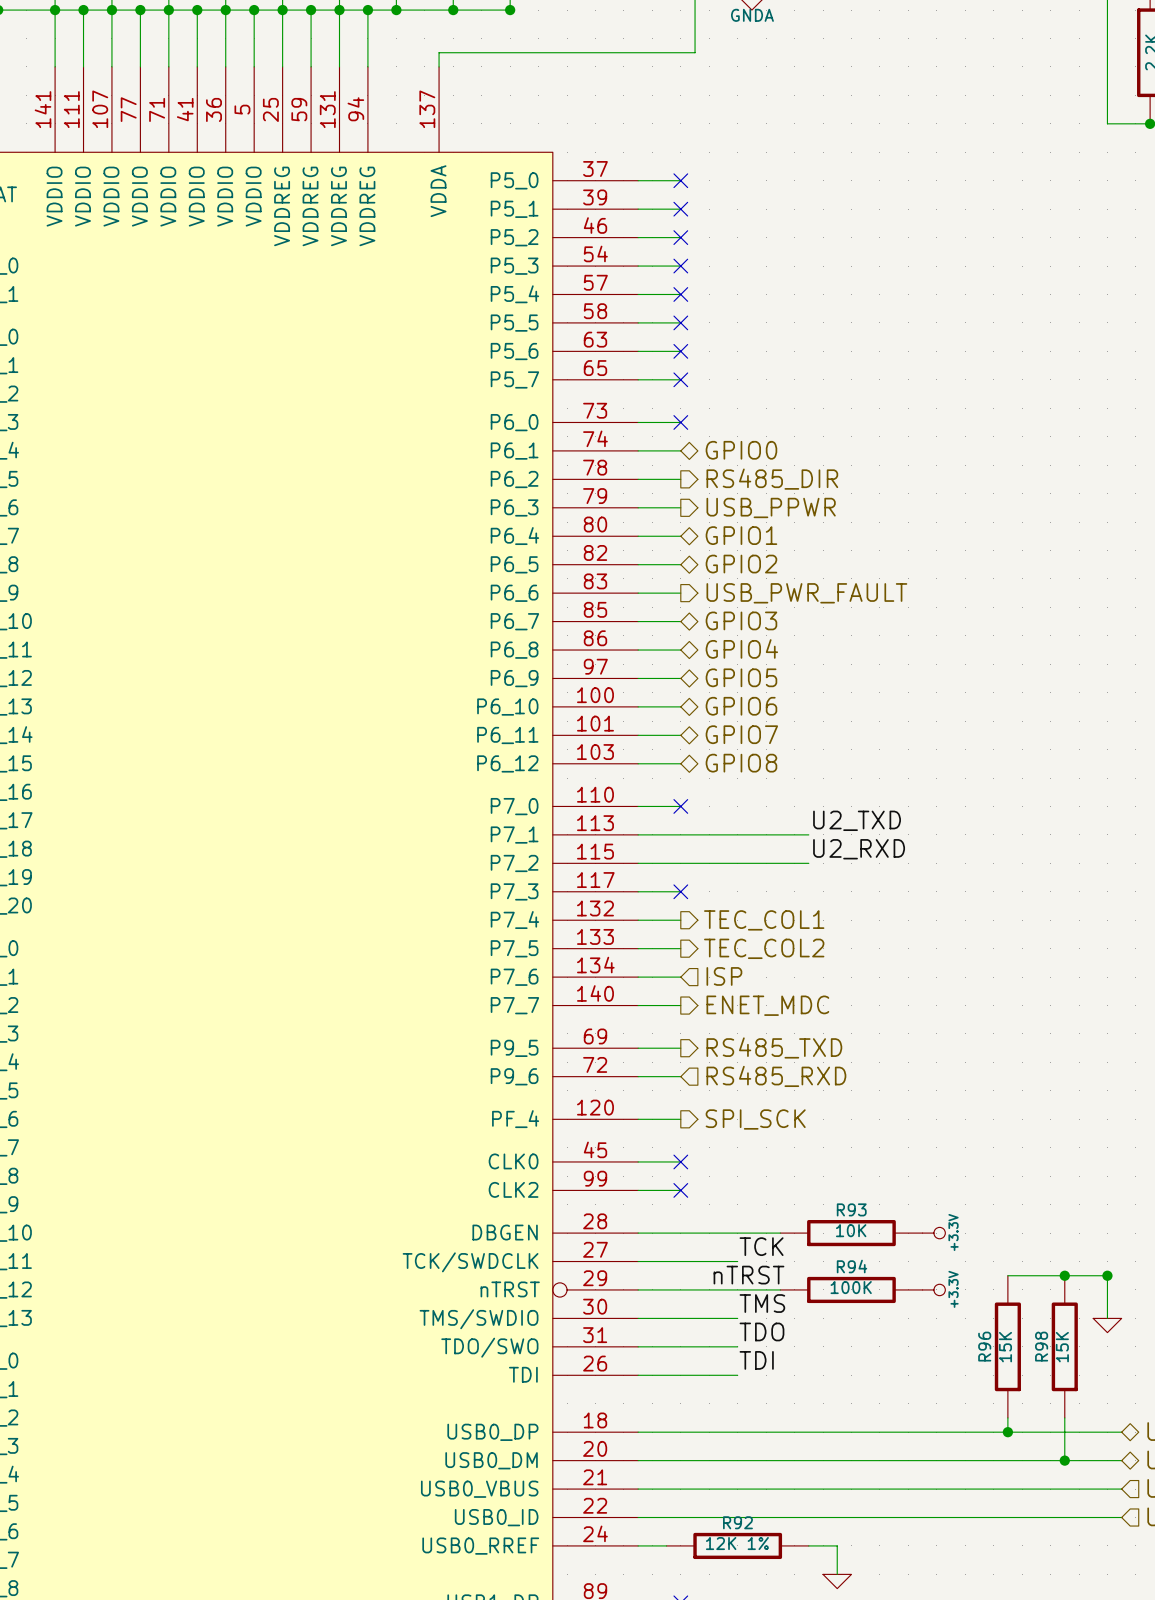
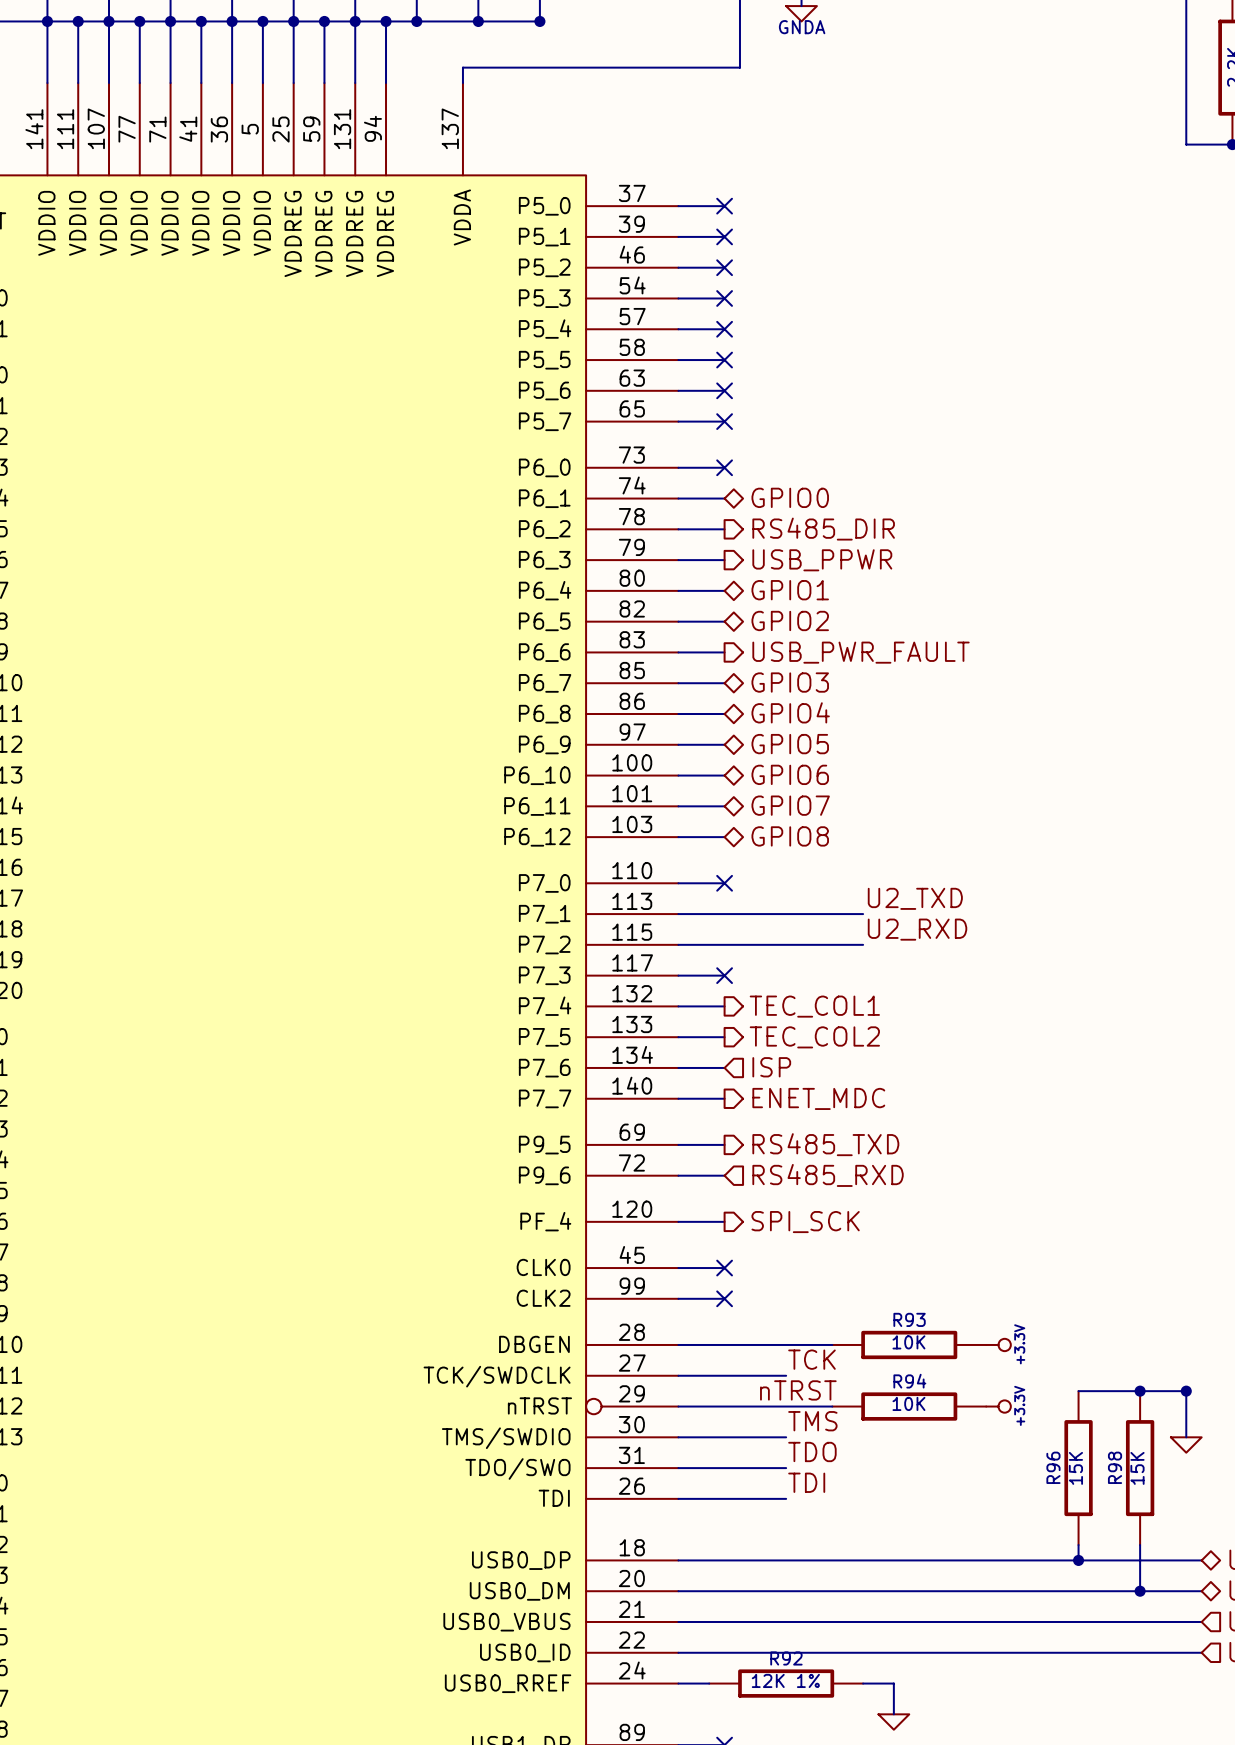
R94 value: 100K (851, 1287) -> 10K (908, 1403)

